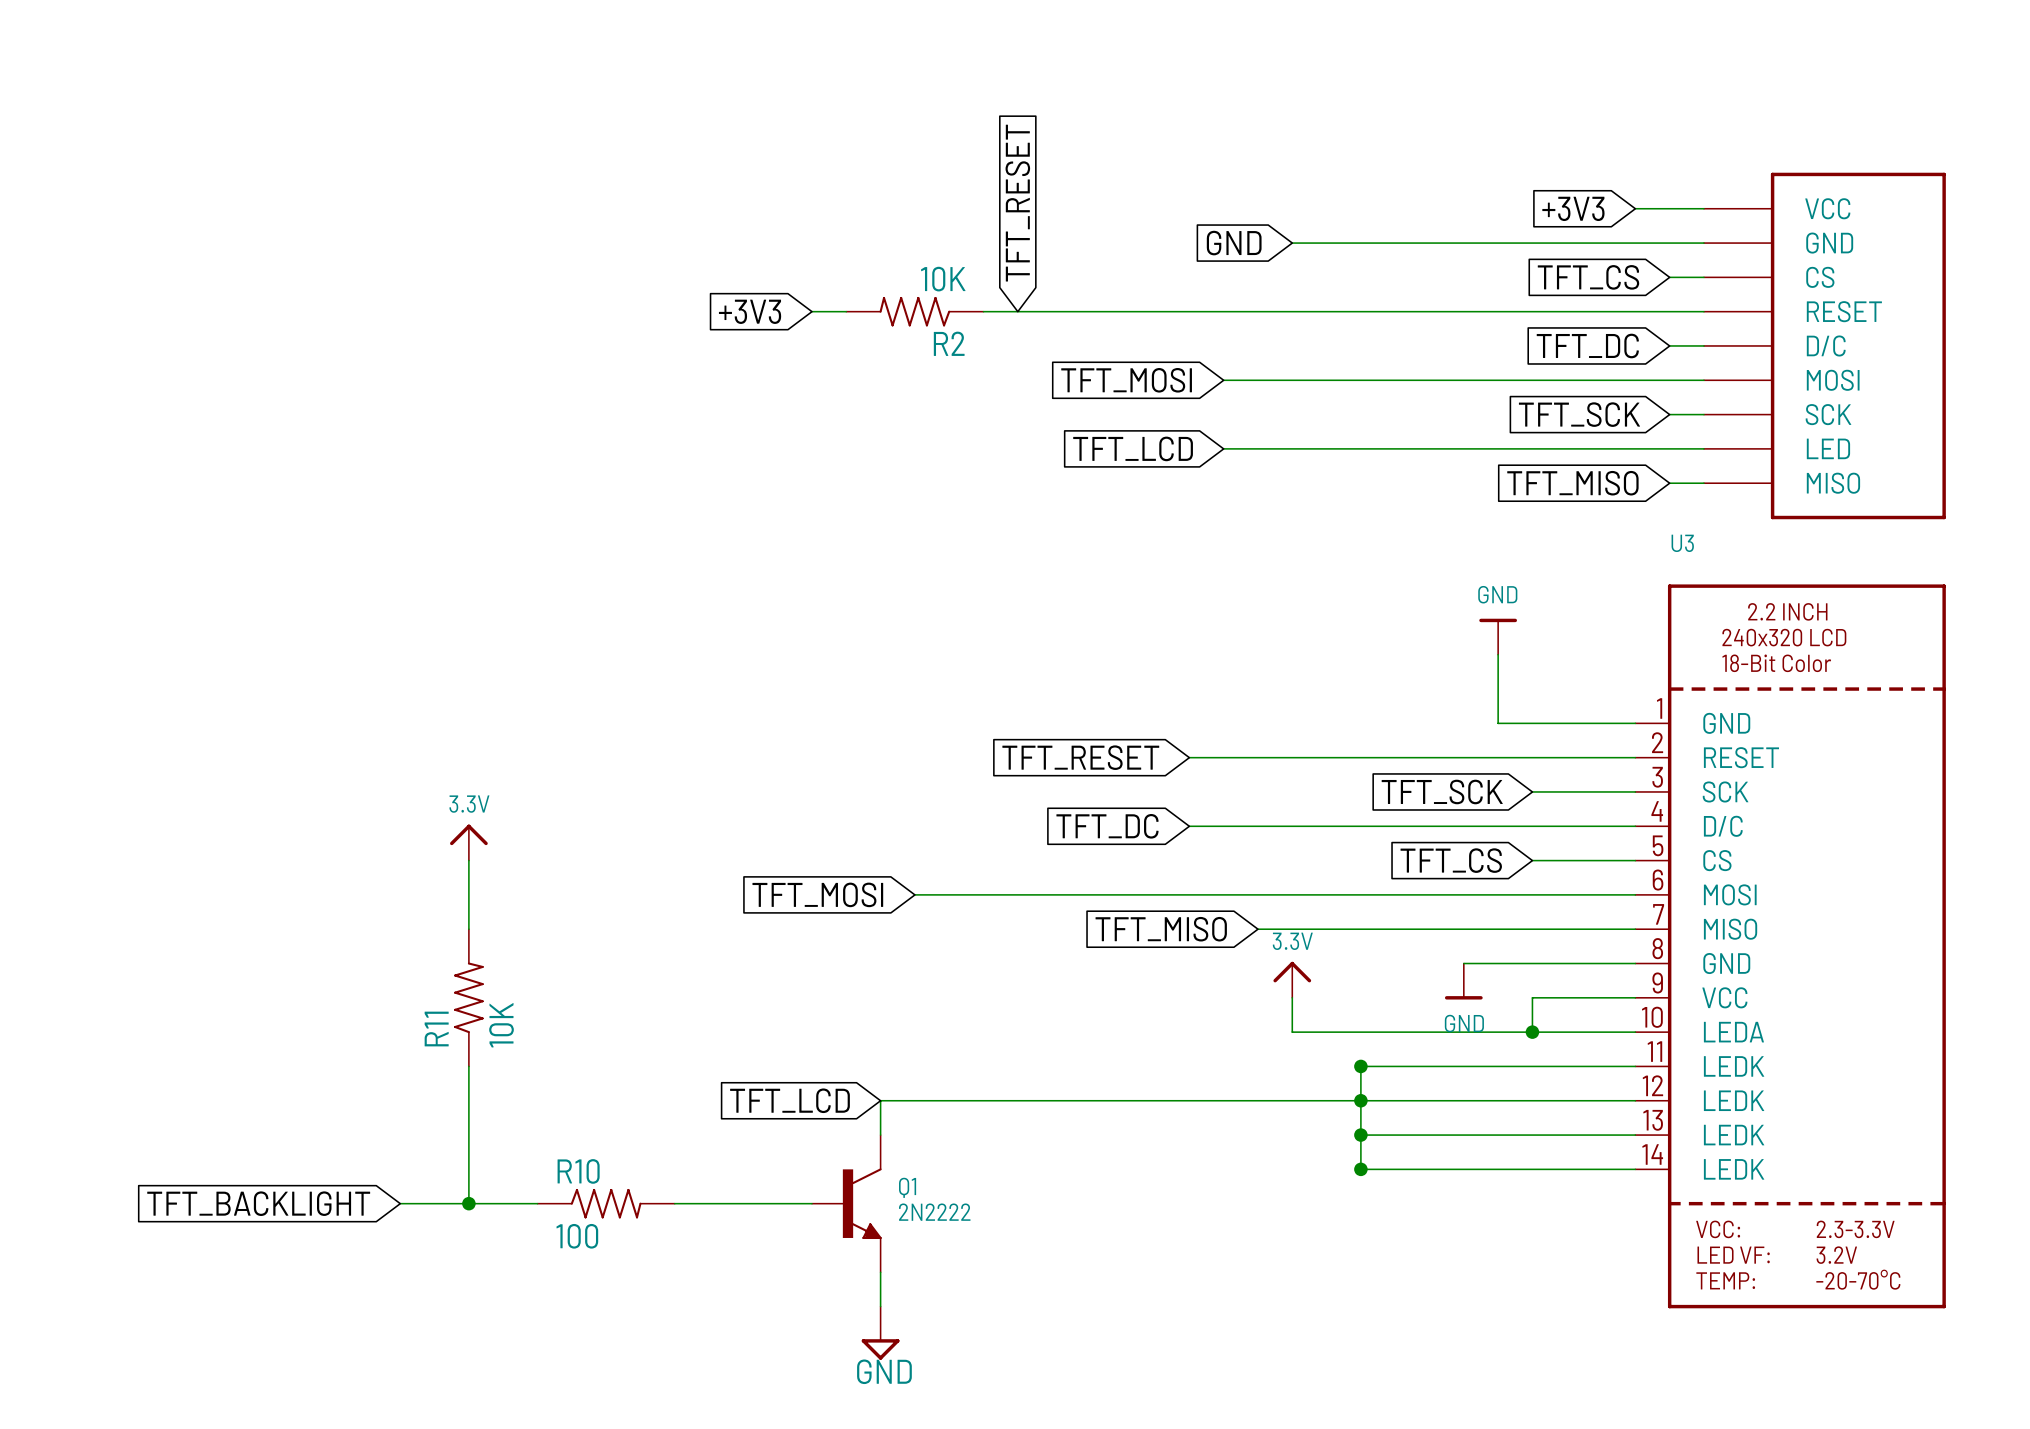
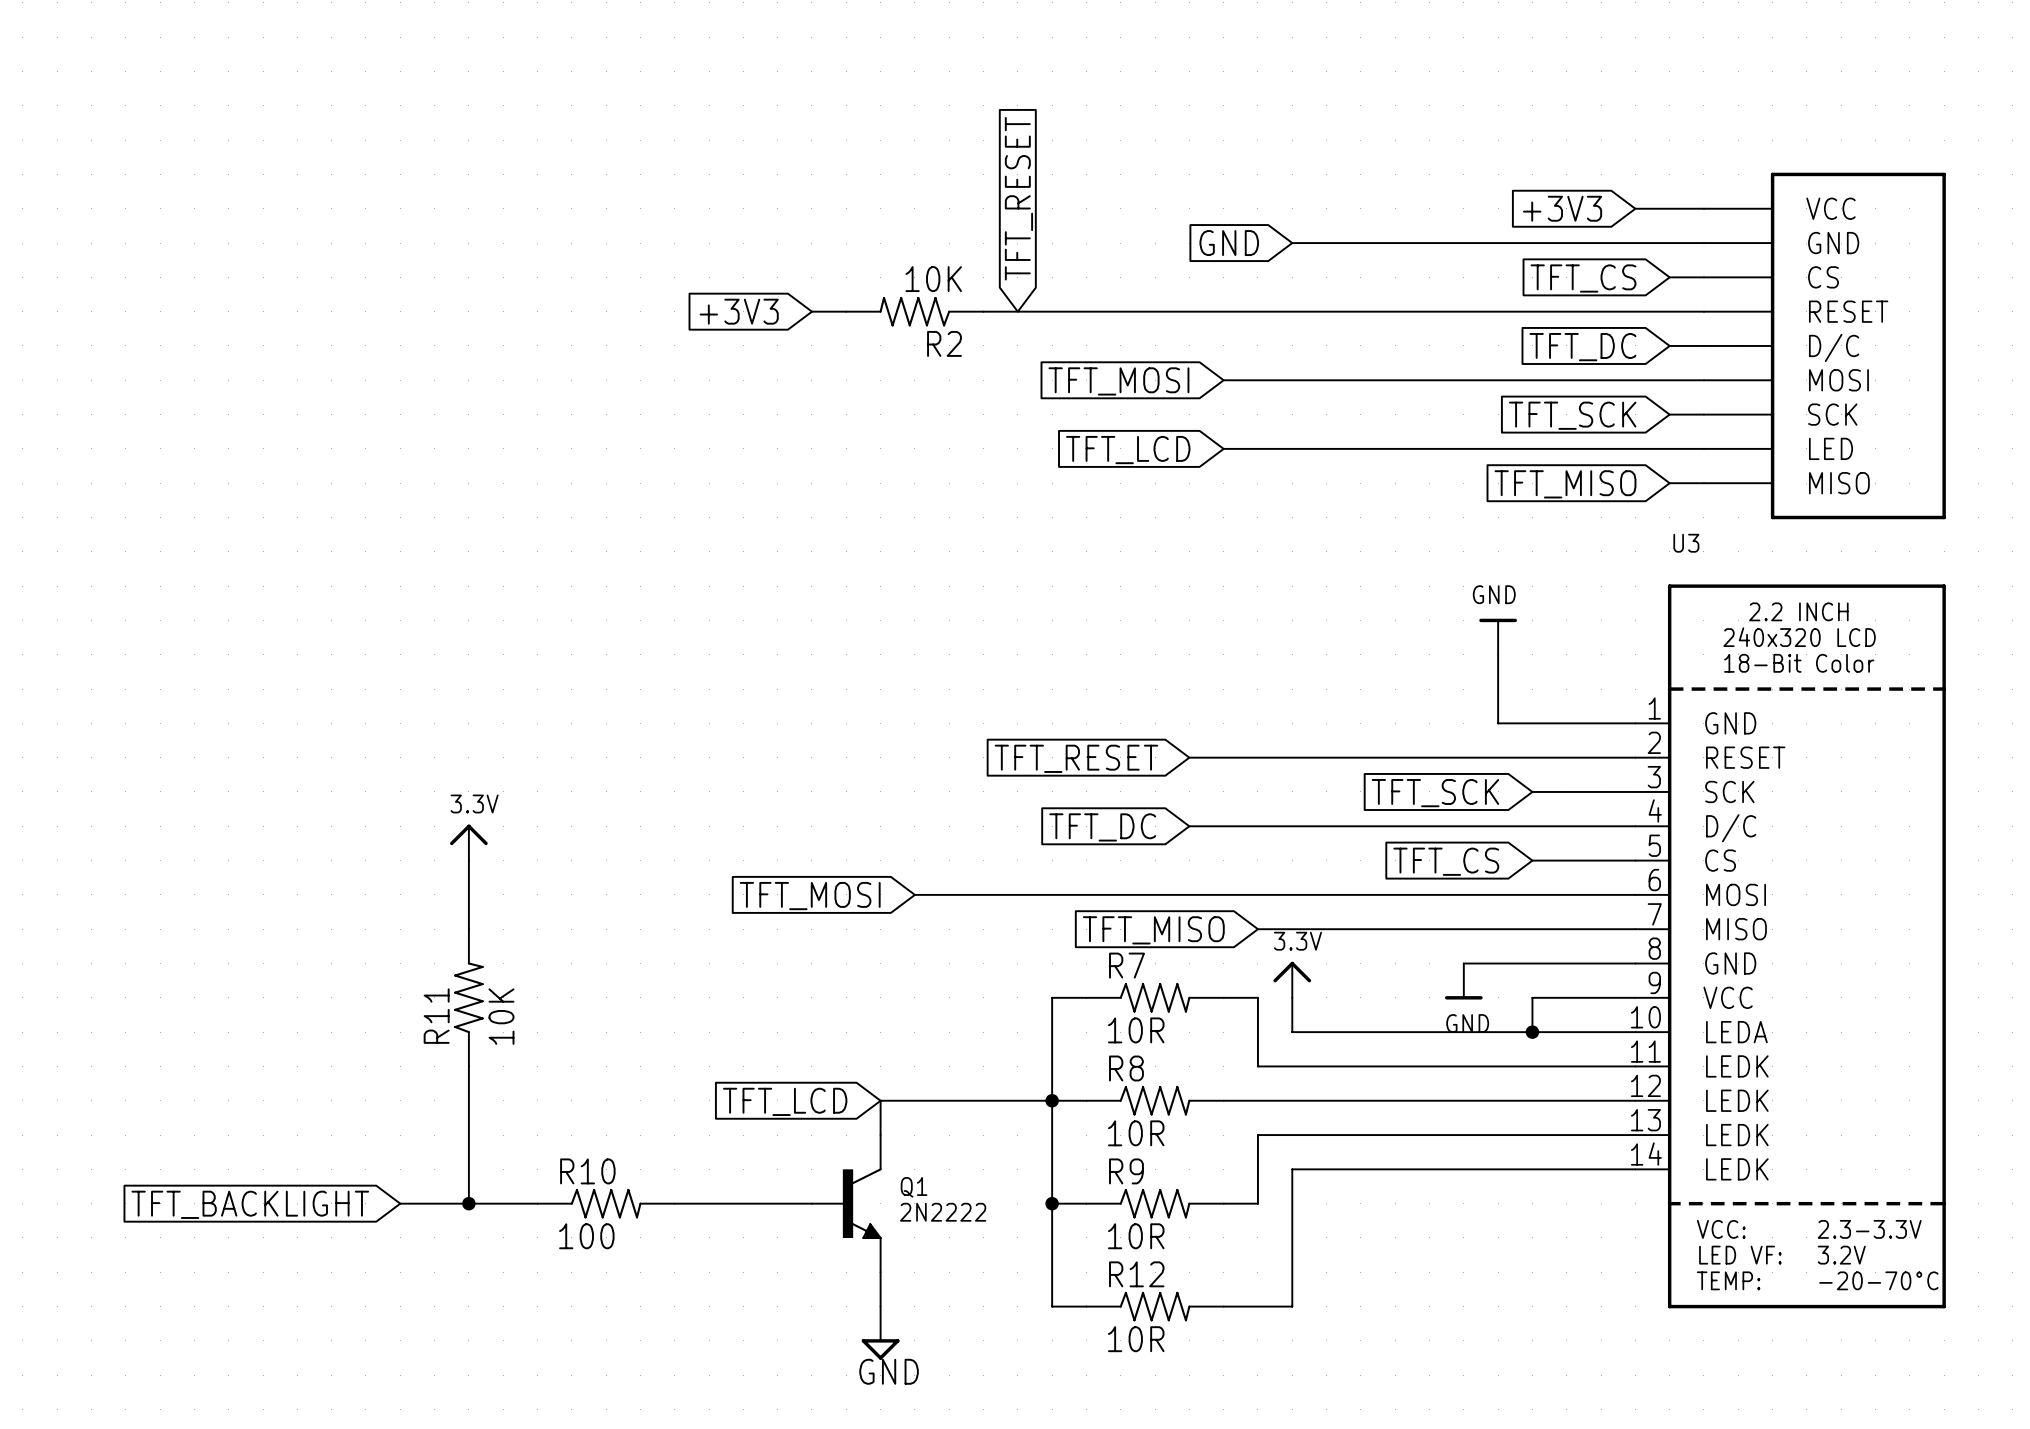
wire: none -> (1086, 997) (1052, 997) (1052, 1306) (1086, 1306)
R7: none -> 10R (1155, 997)
wire: (1360, 1066) (1360, 1169) -> (1360, 1066) (1257, 1066) (1257, 997) (1223, 997)
junction: (1360, 1066) -> none
junction: none -> (1052, 1100)
R8: none -> 10R (1155, 1100)
junction: (1360, 1100) -> none
wire: none -> (1360, 1135) (1257, 1135) (1257, 1203) (1223, 1203)
junction: (1360, 1135) -> none
wire: none -> (1360, 1169) (1292, 1169) (1292, 1306) (1223, 1306)
junction: (1360, 1169) -> none
wire: none -> (1052, 1203) (1086, 1203)
junction: none -> (1052, 1203)
R9: none -> 10R (1155, 1203)
R12: none -> 10R (1155, 1306)

